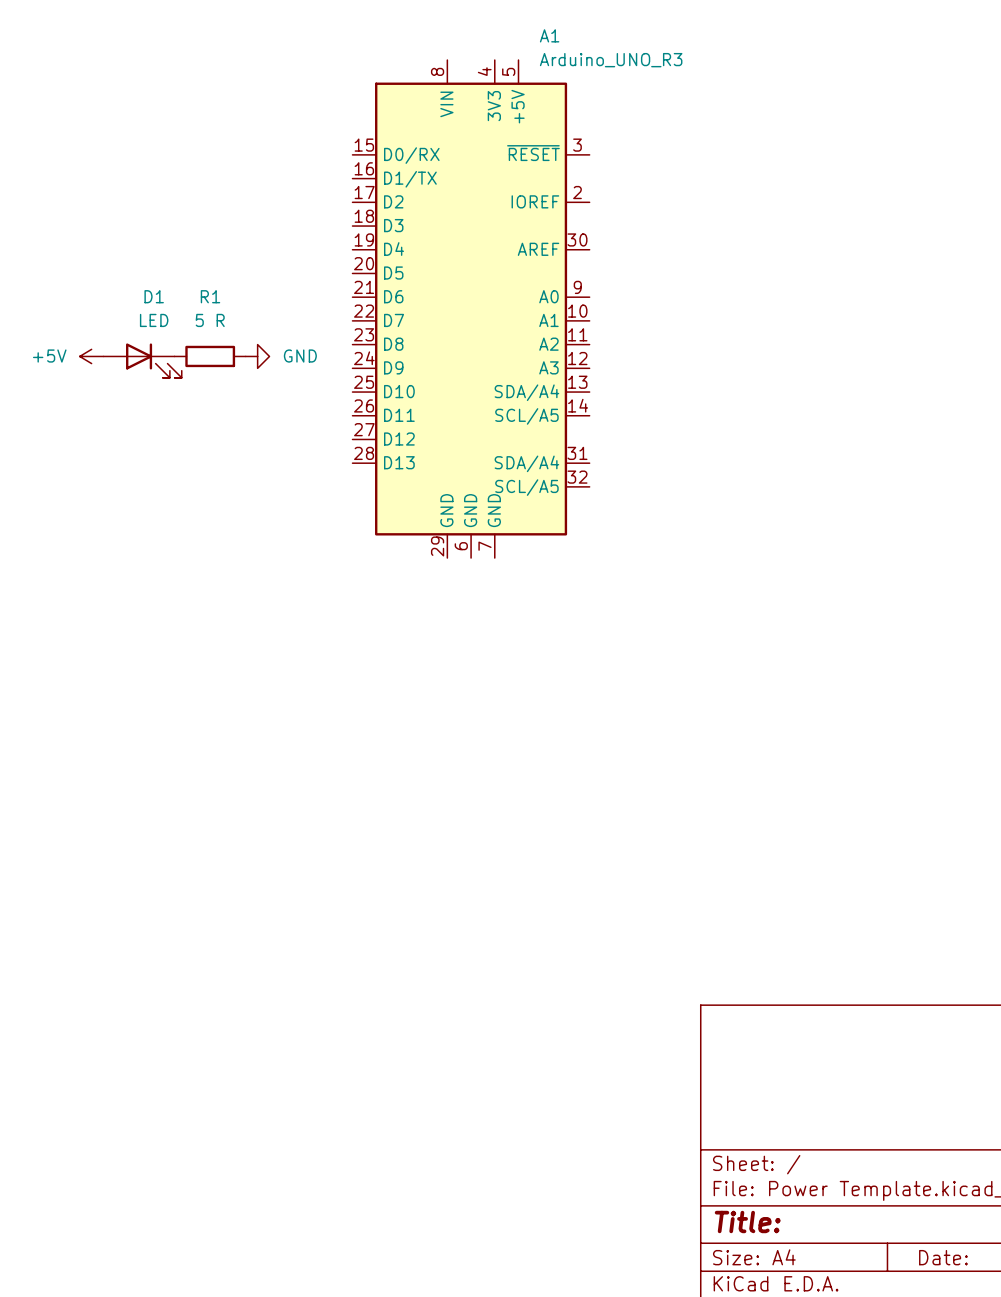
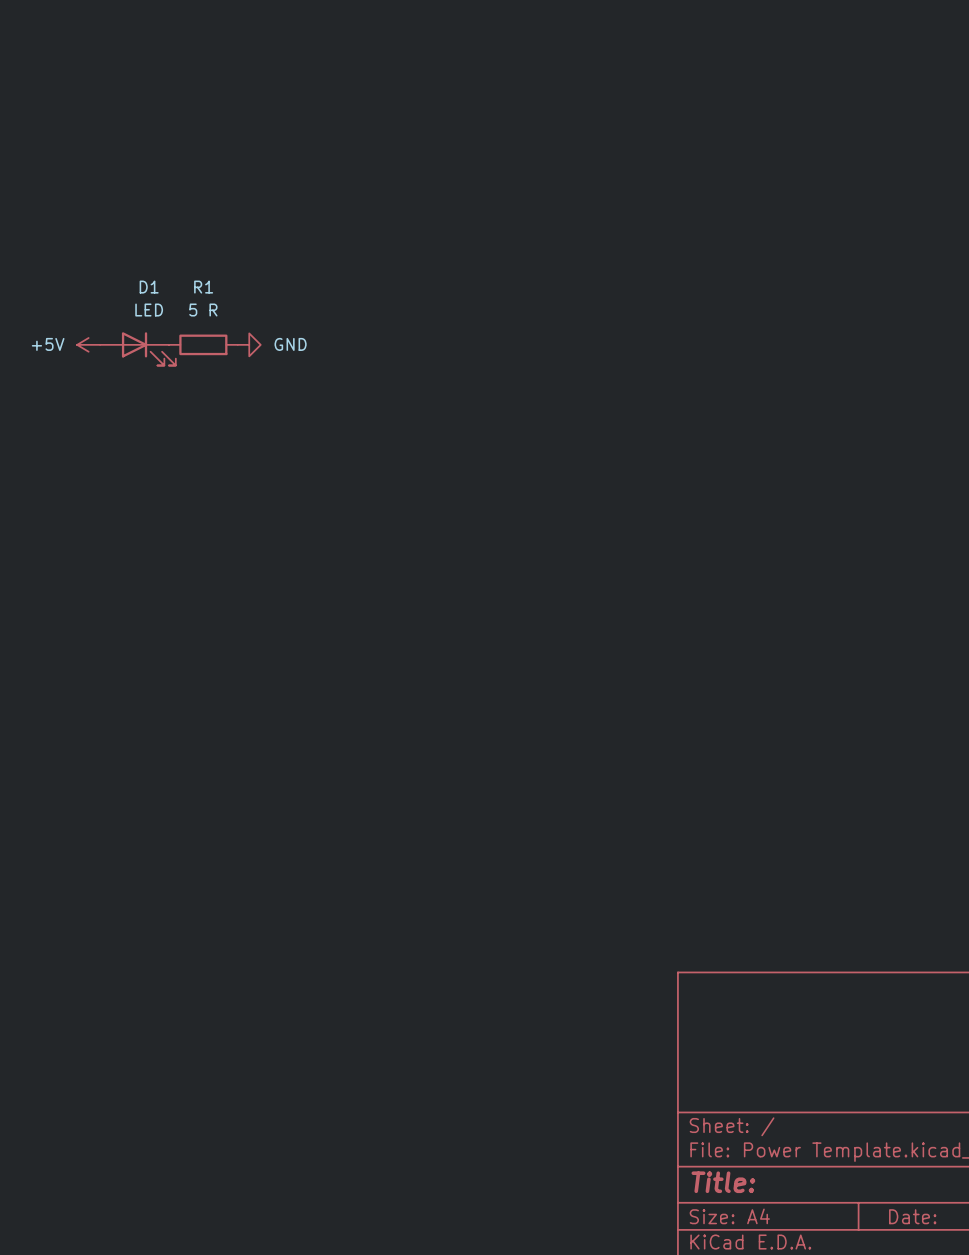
A1: Arduino_UNO_R3 (471, 309) -> none

